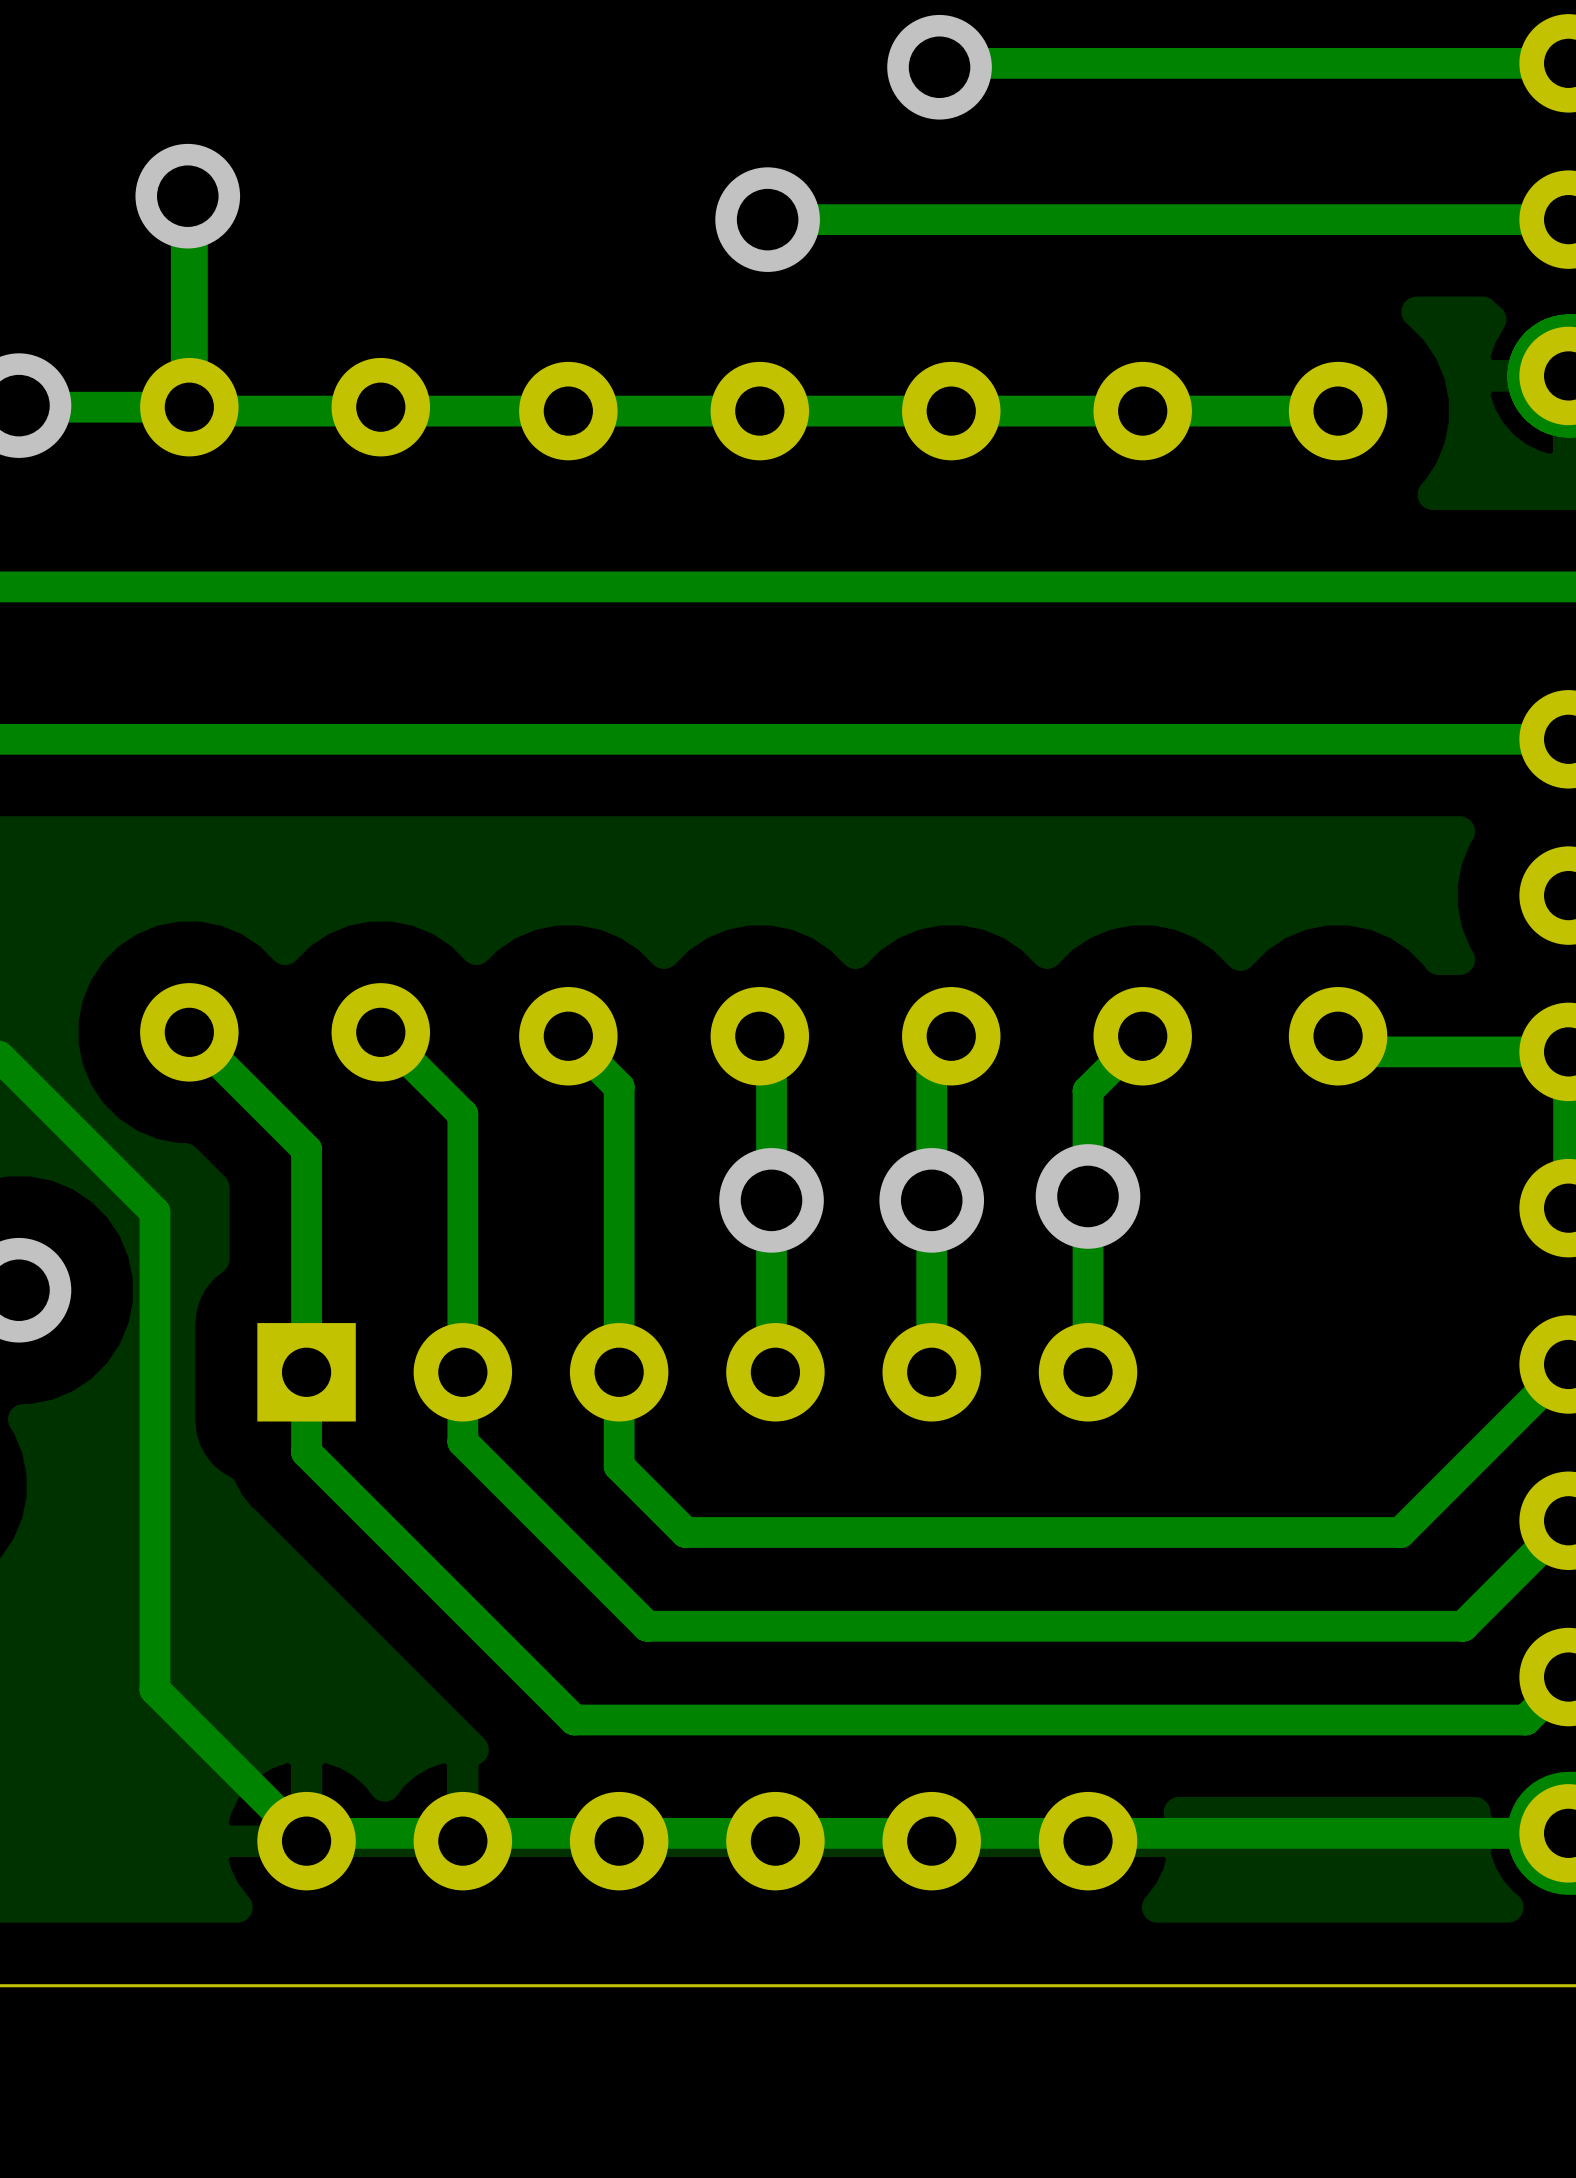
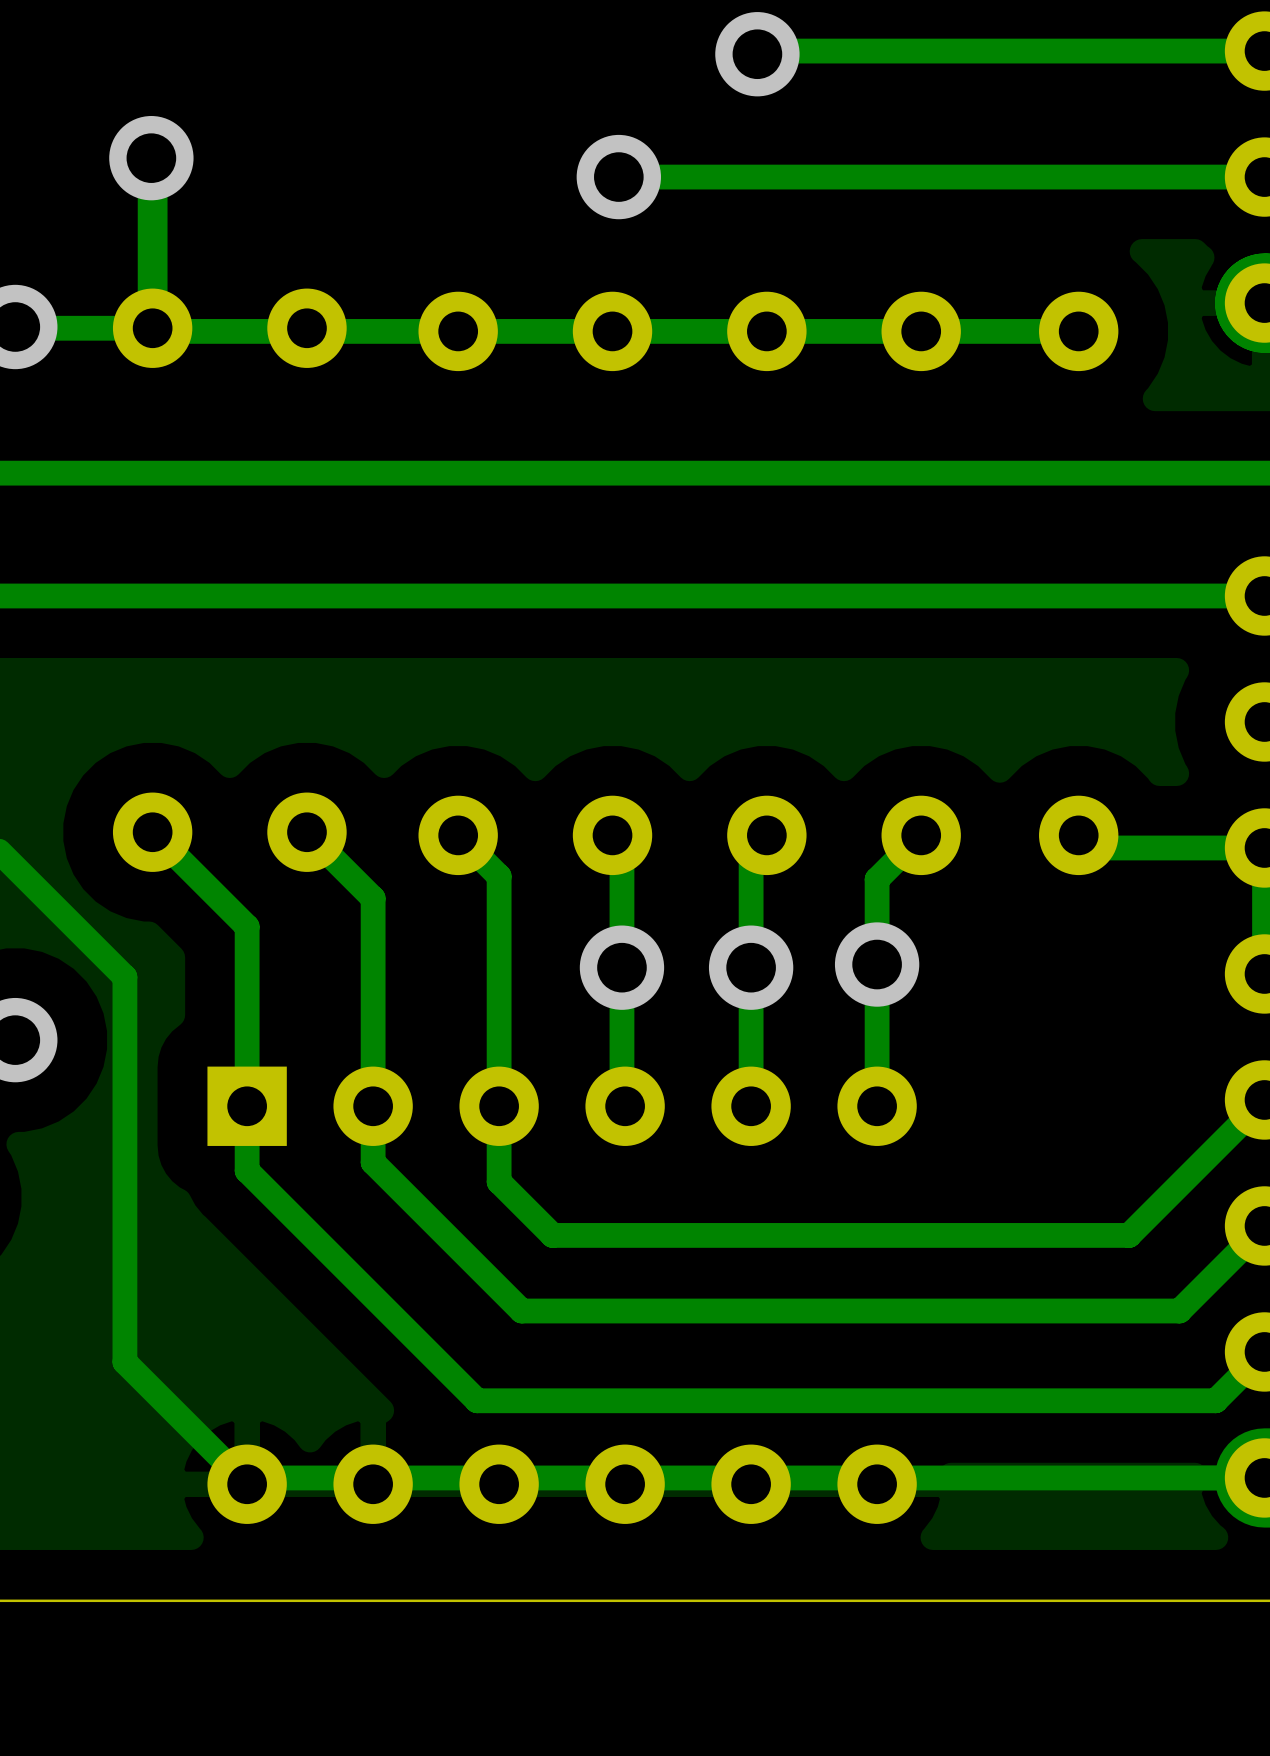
track: (1525, 1720) (574, 1720) -> (1229, 1386) (1215, 1400) (477, 1400) (462, 1386)

